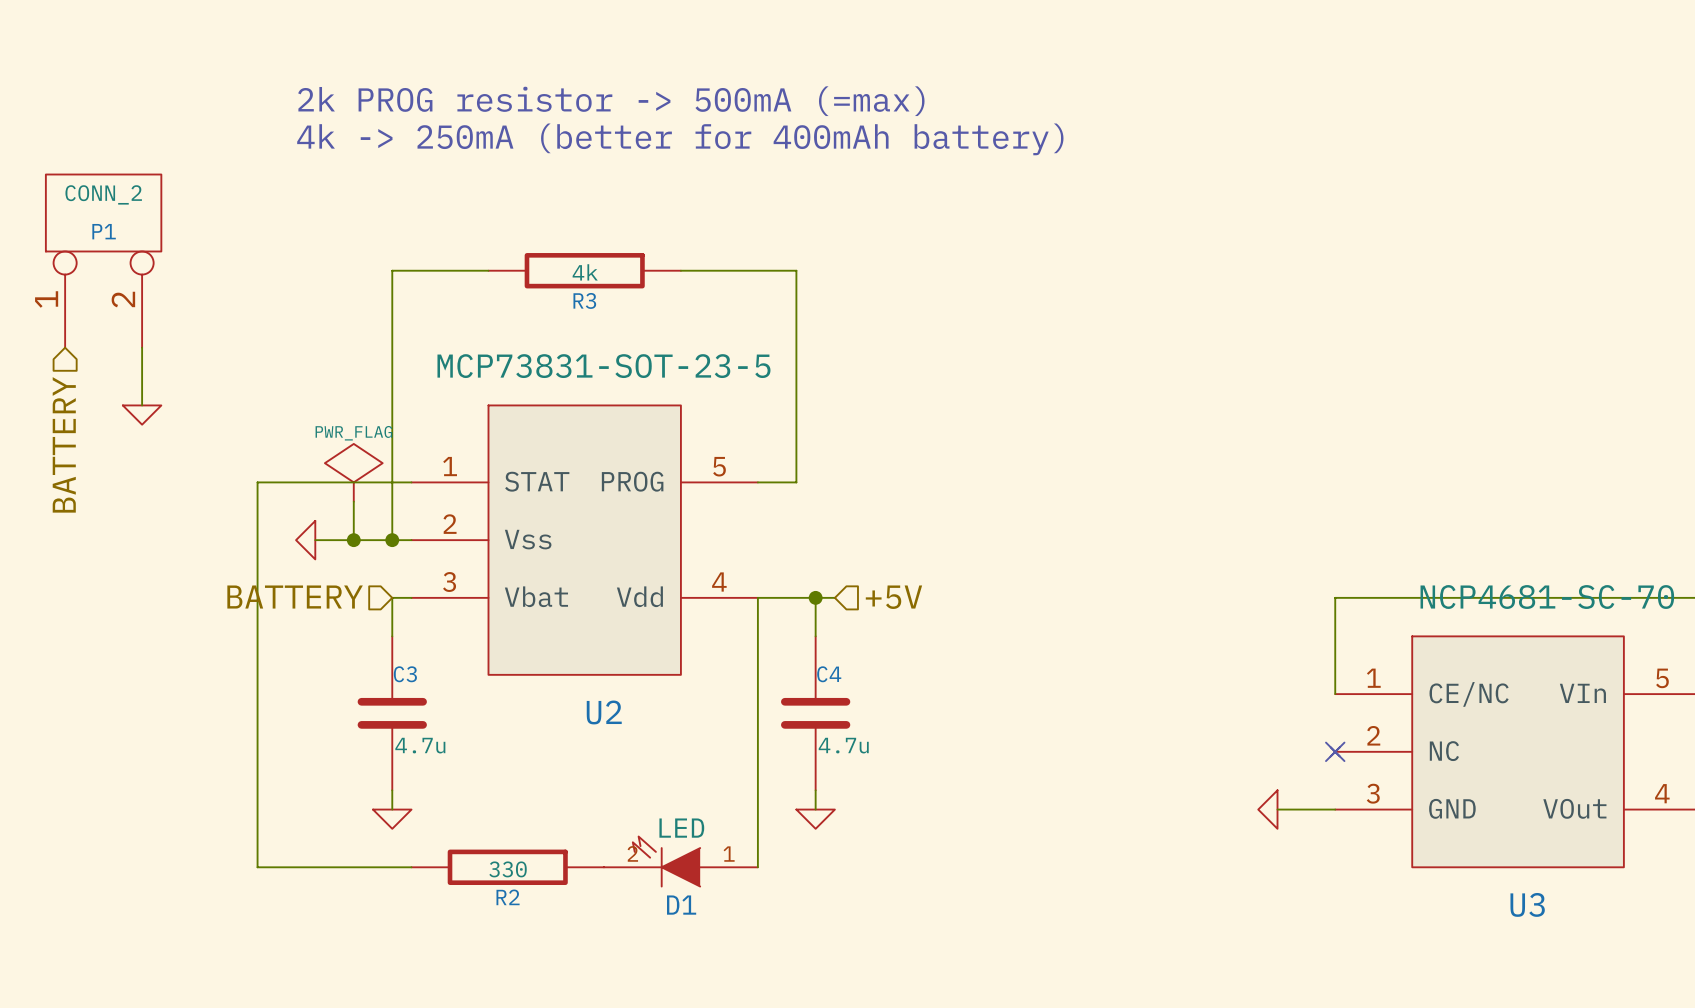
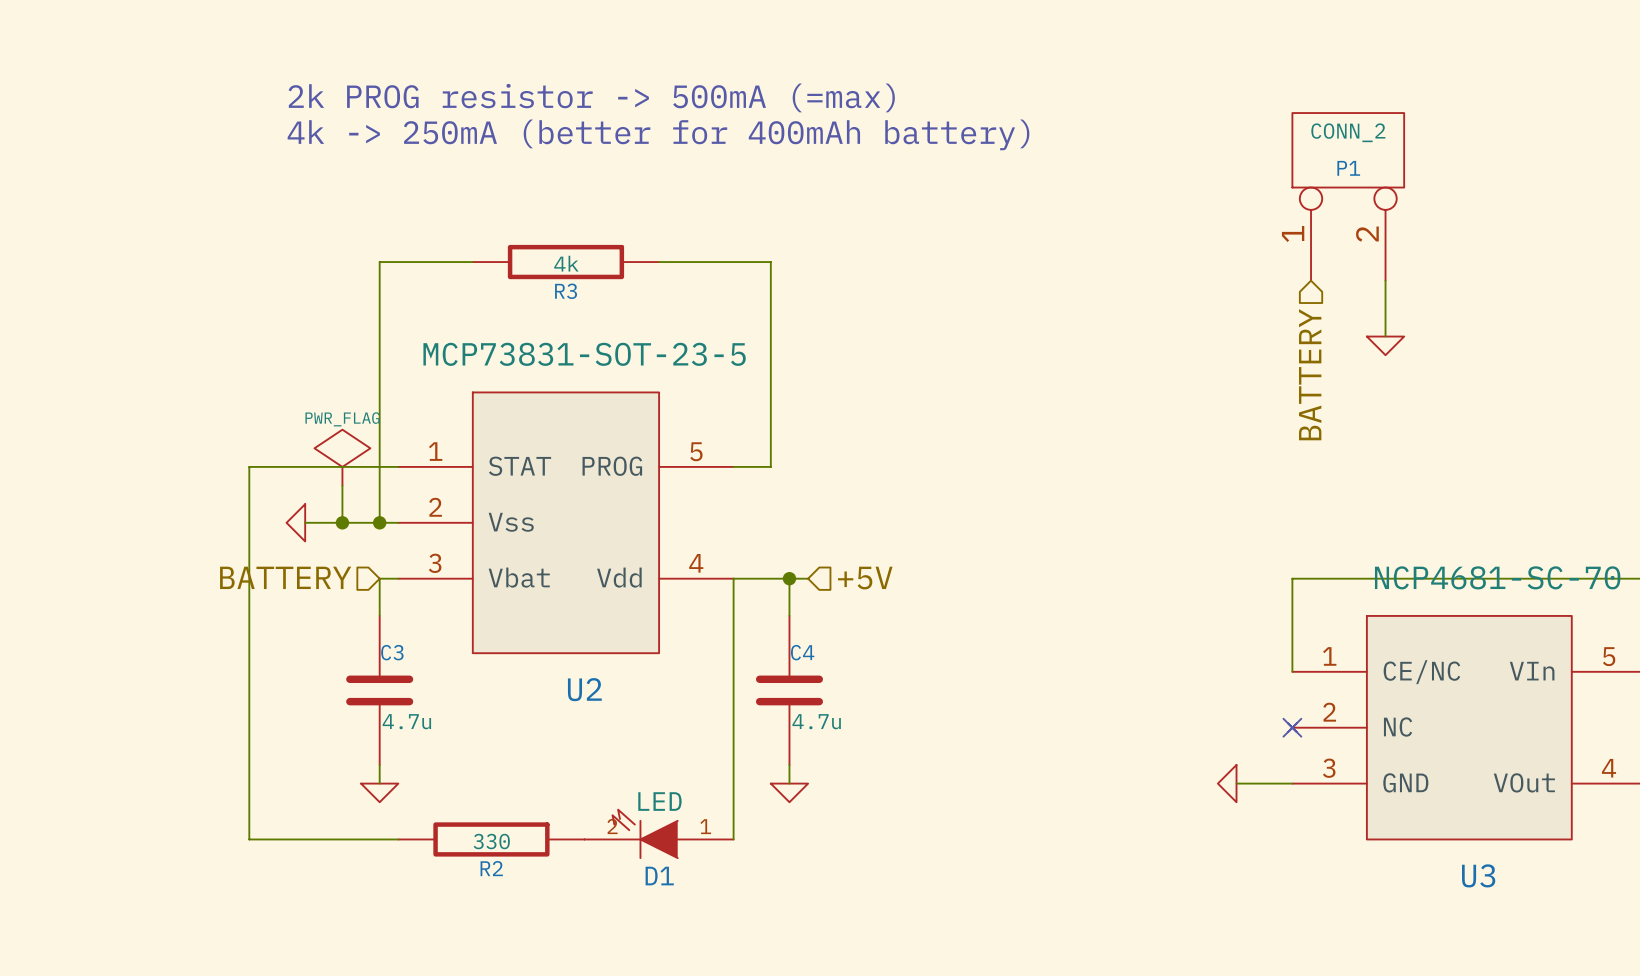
P1 position: (103, 261) -> (1348, 196)
wire: none -> (1385, 280) (1385, 336)
wire: (142, 347) (142, 405) -> none
power symbol: none -> (1385, 345)
hierarchical label: none -> BATTERY (1310, 374)
power symbol: (142, 415) -> none
hierarchical label: BATTERY (64, 444) -> none

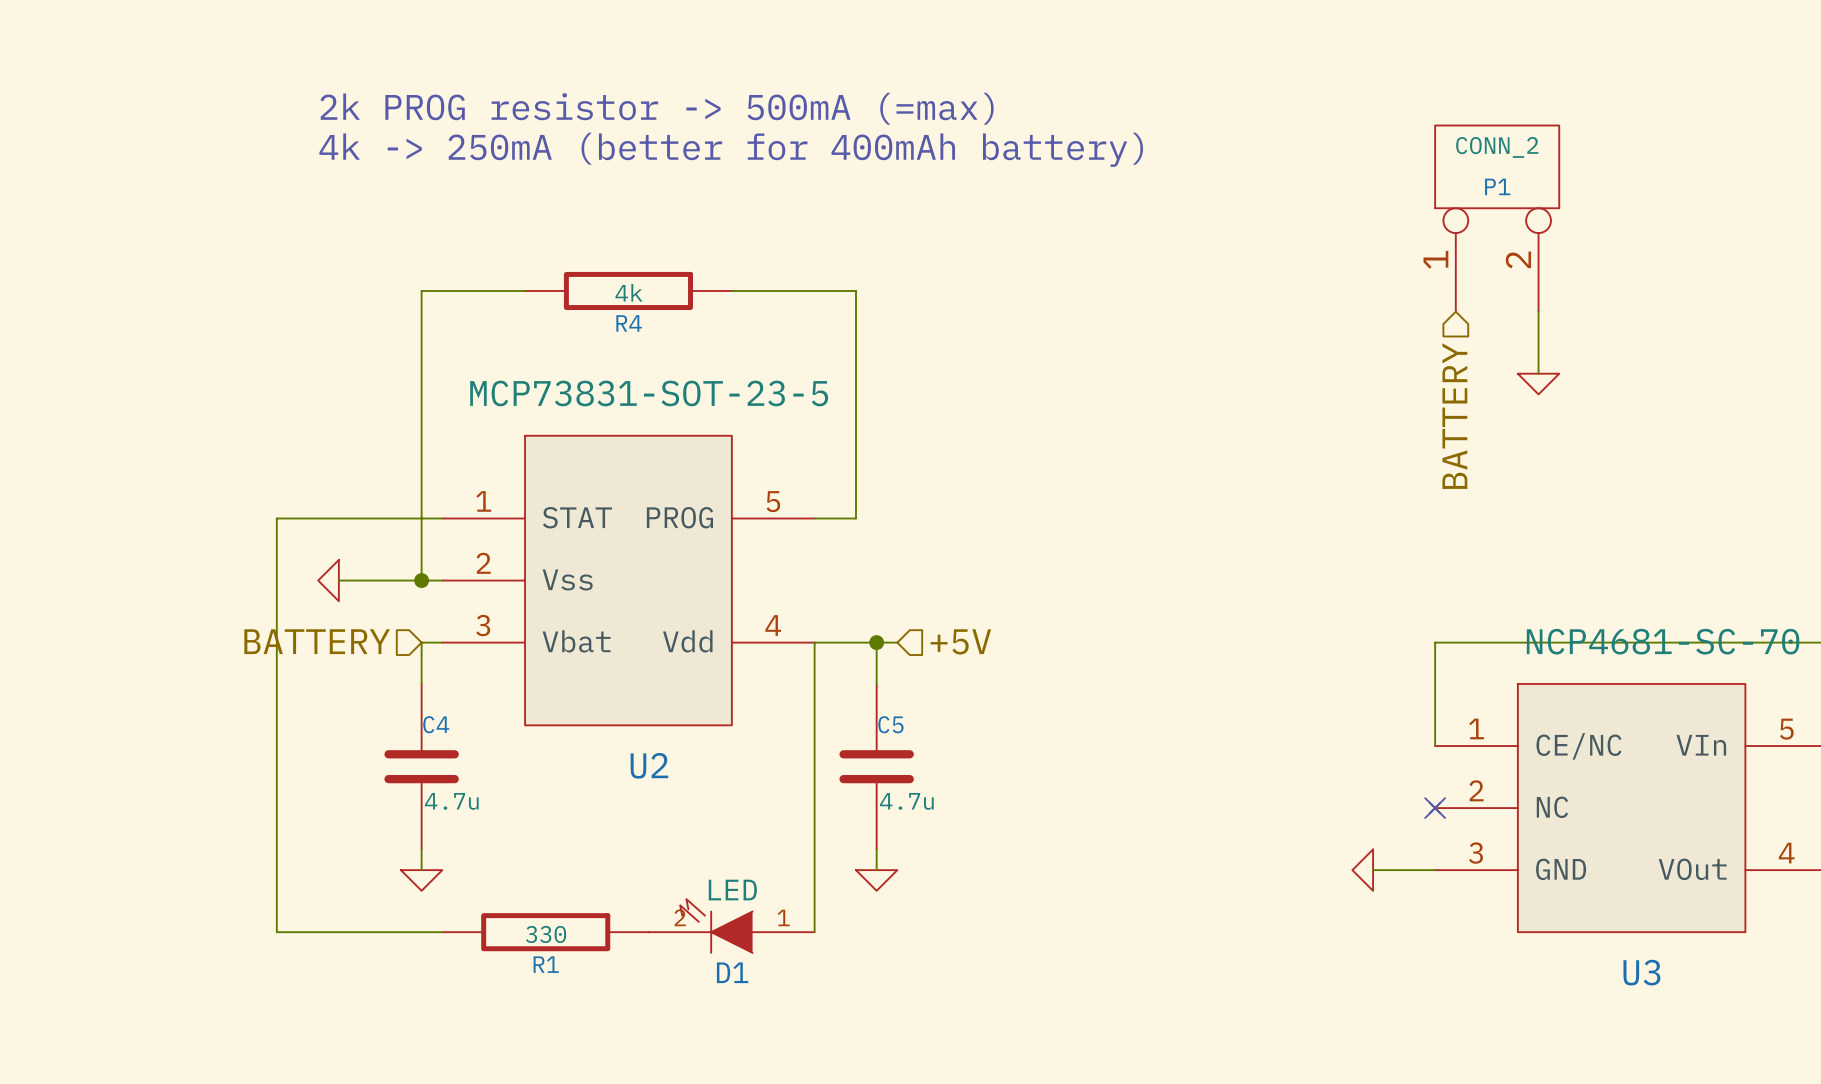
R3 name: R3 (566, 291) -> R4 (629, 323)
power symbol: PWR_FLAG (342, 457) -> none
wire: (342, 485) (342, 522) -> none
junction: (342, 522) -> none
C3 name: C3 (392, 652) -> C4 (436, 724)
C4 name: C4 (802, 652) -> C5 (890, 724)
R2 name: R2 (491, 868) -> R1 (546, 964)

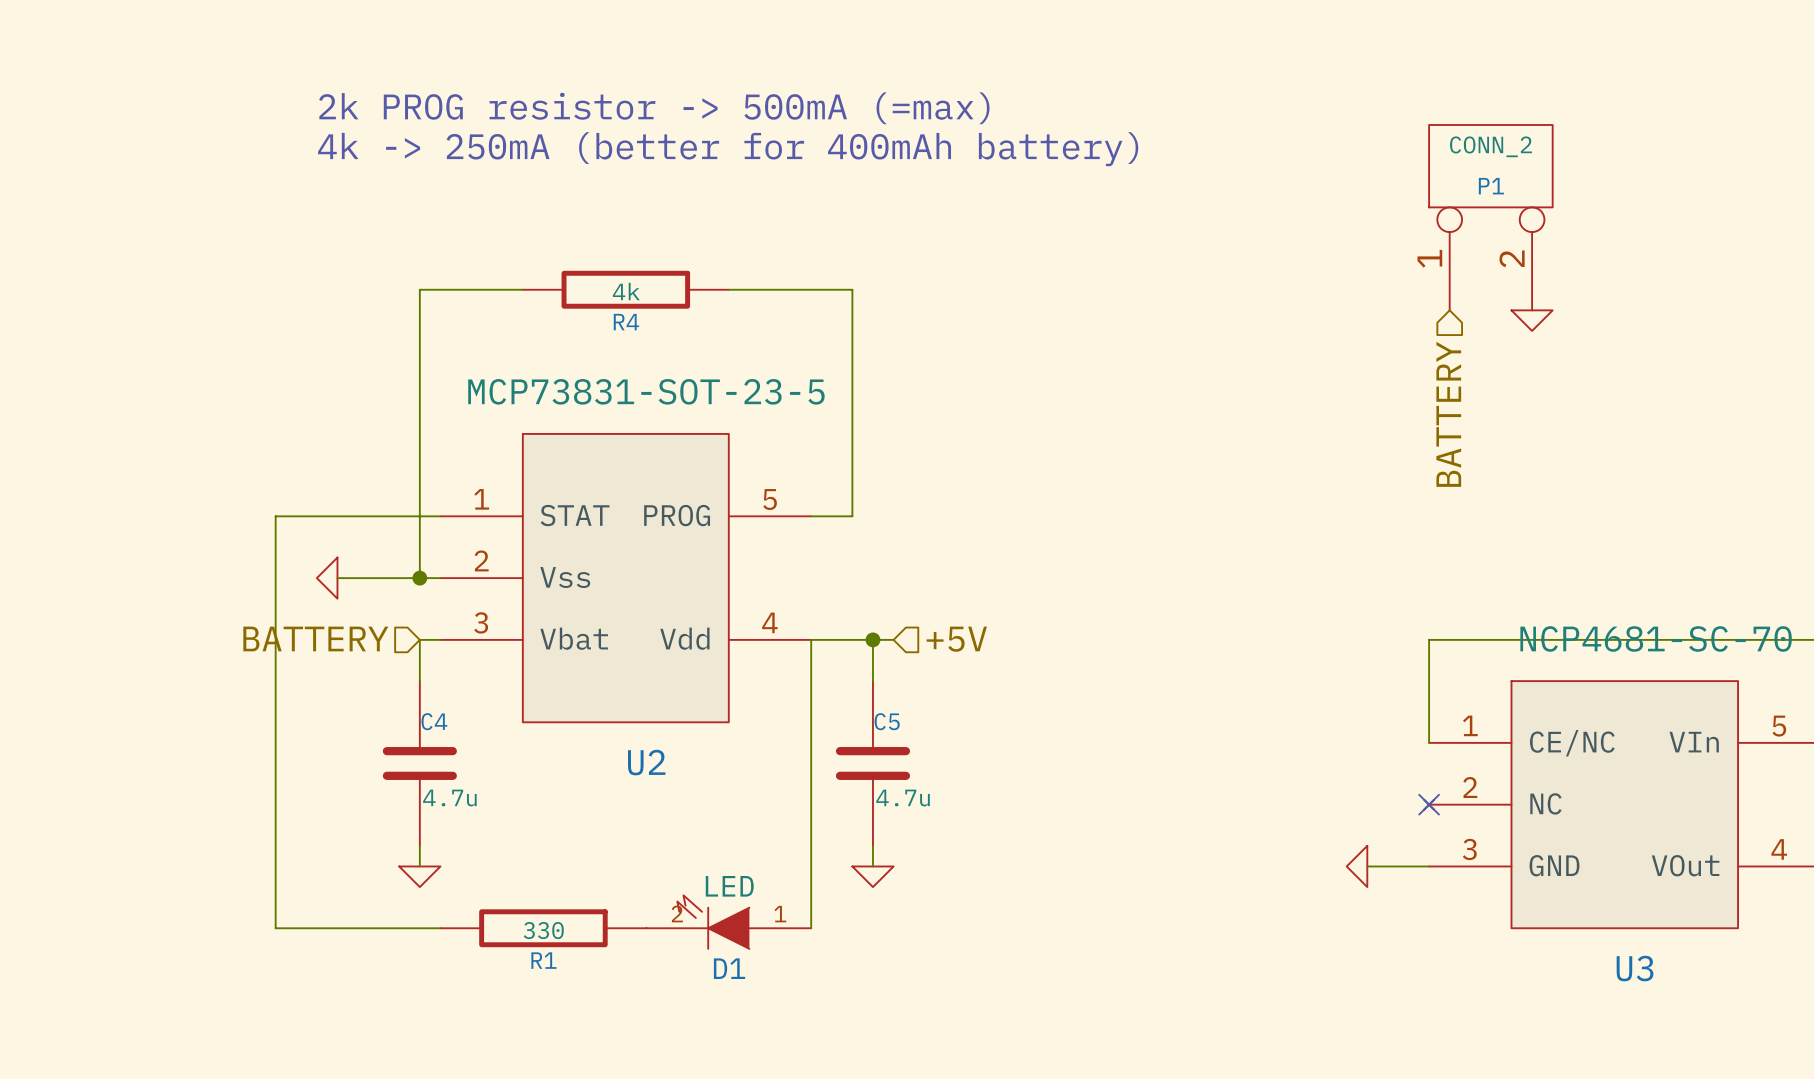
wire: (1538, 311) (1538, 373) -> none
power symbol position: (1538, 384) -> (1532, 320)

